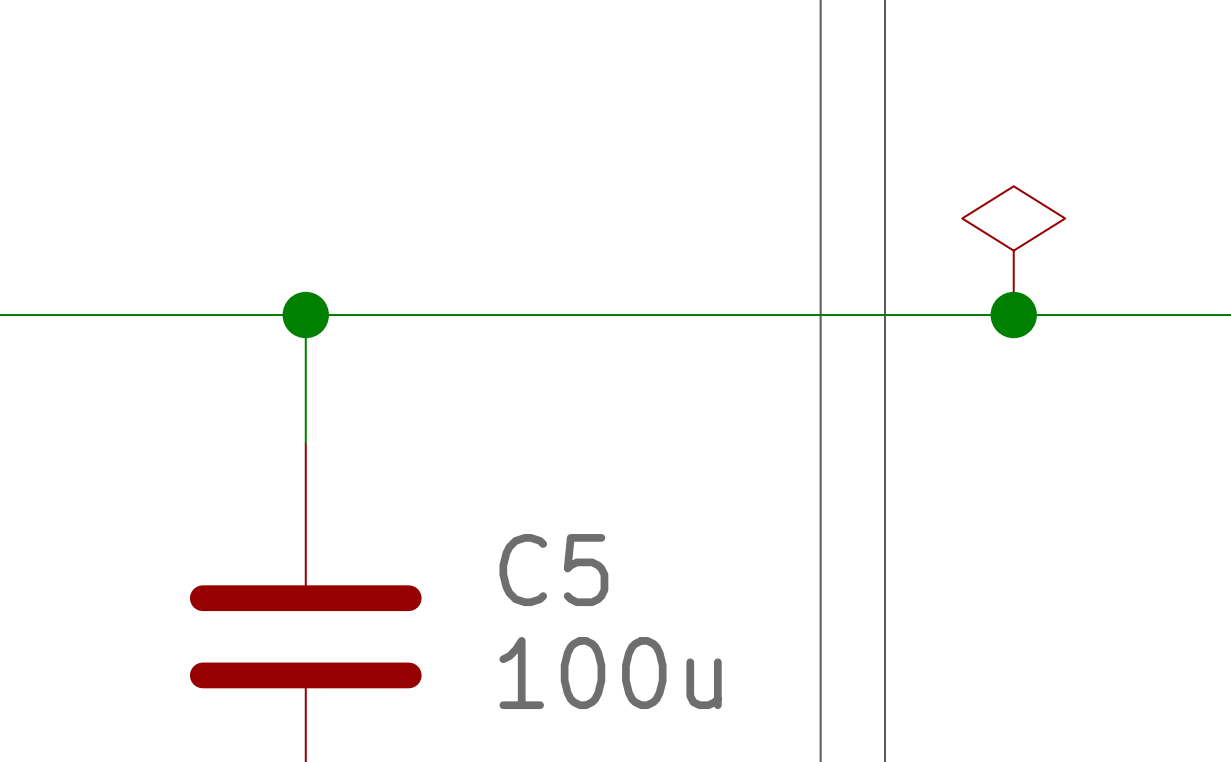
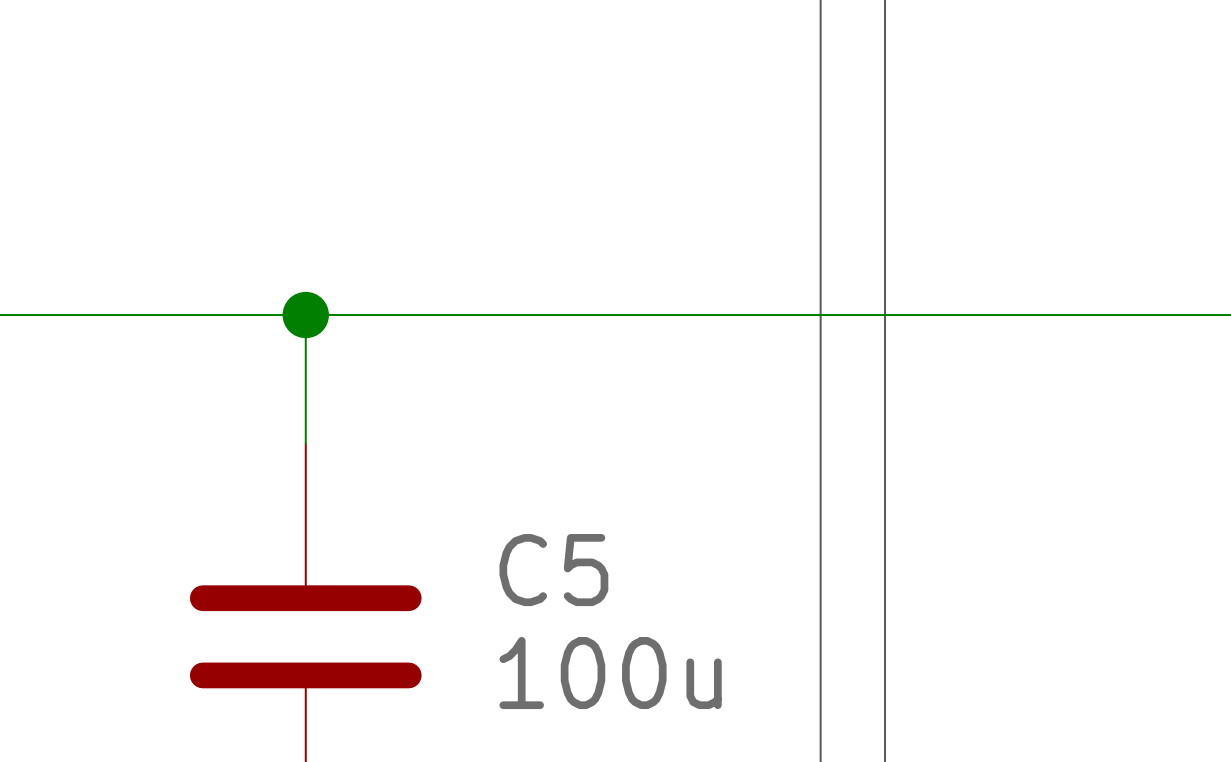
power symbol: (1013, 250) -> none
junction: (1013, 315) -> none

